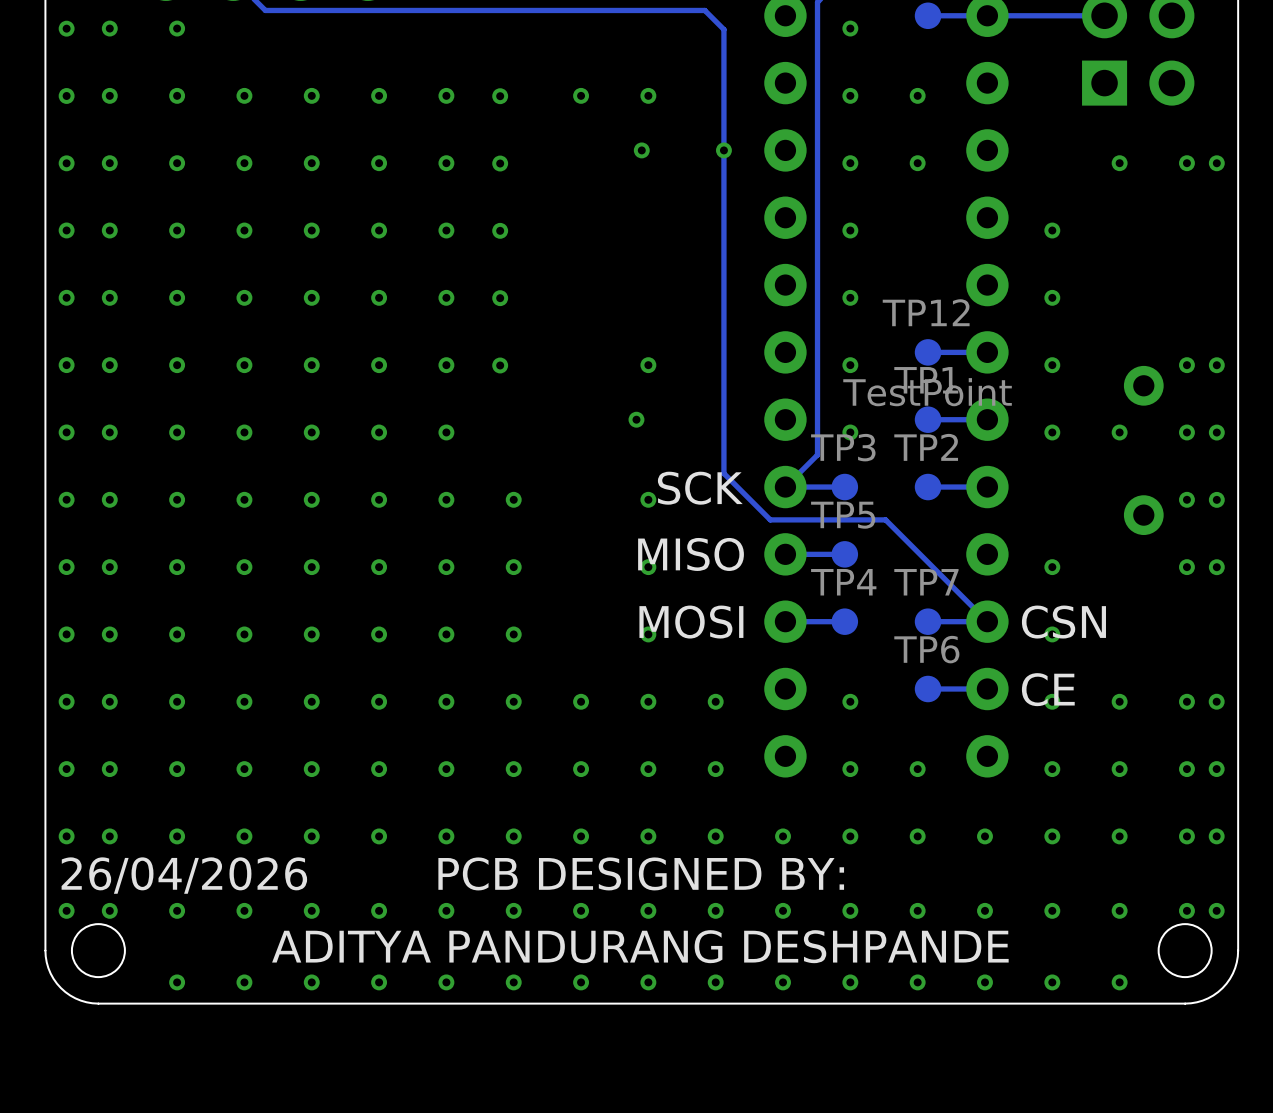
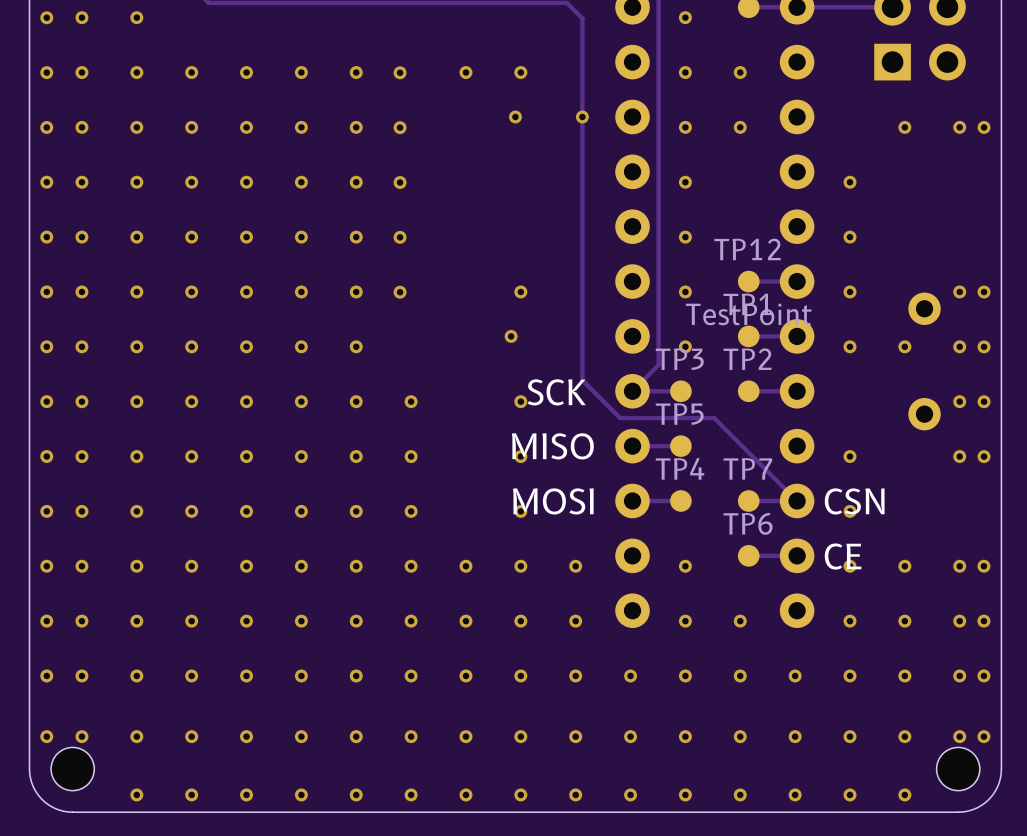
text: PCB DESIGNED BY: (641, 873) -> none
text: 26/04/2026 (184, 875) -> none
text: ADITYA PANDURANG DESHPANDE (640, 946) -> none

